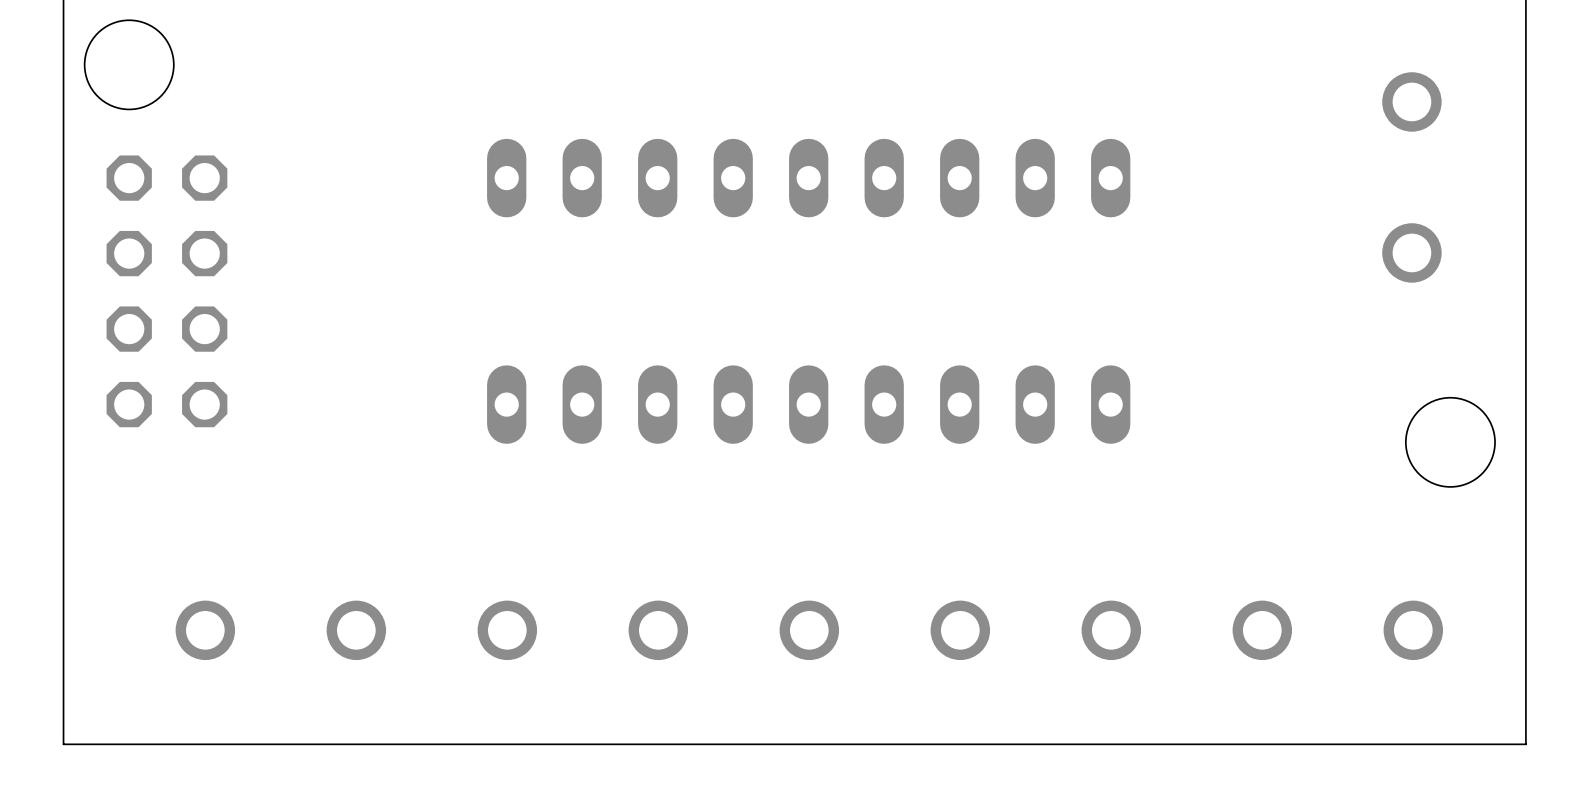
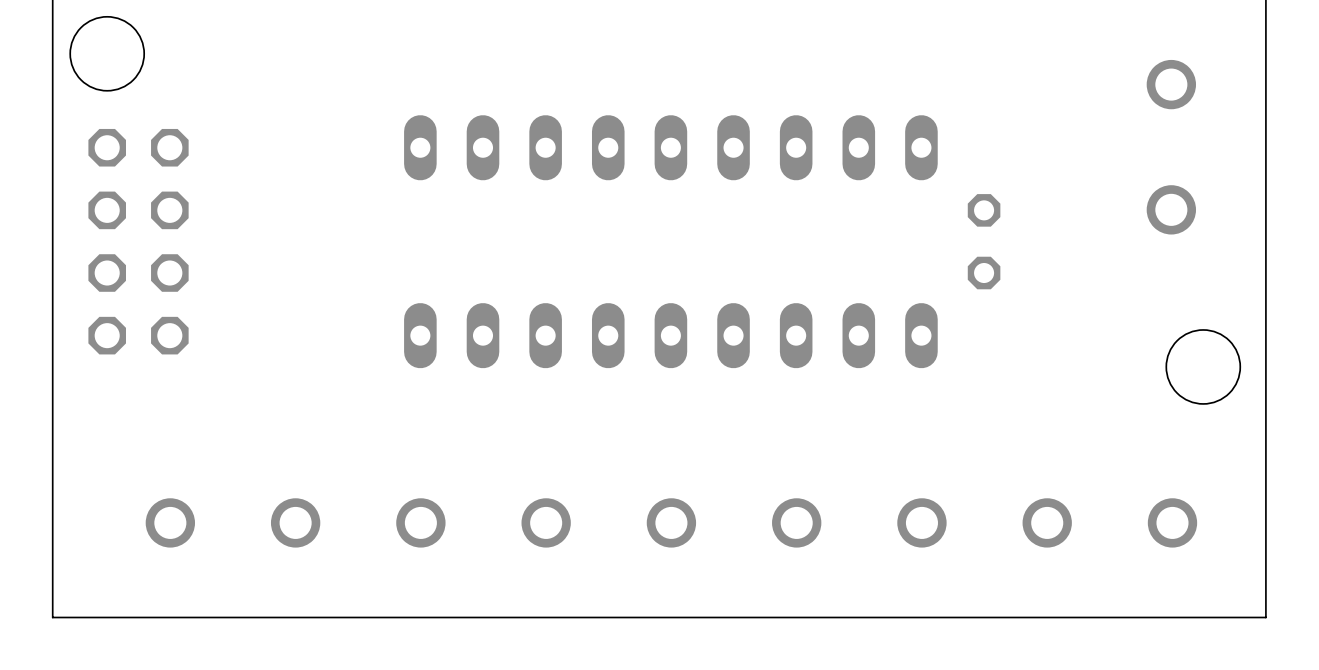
part: none -> (984, 241)

